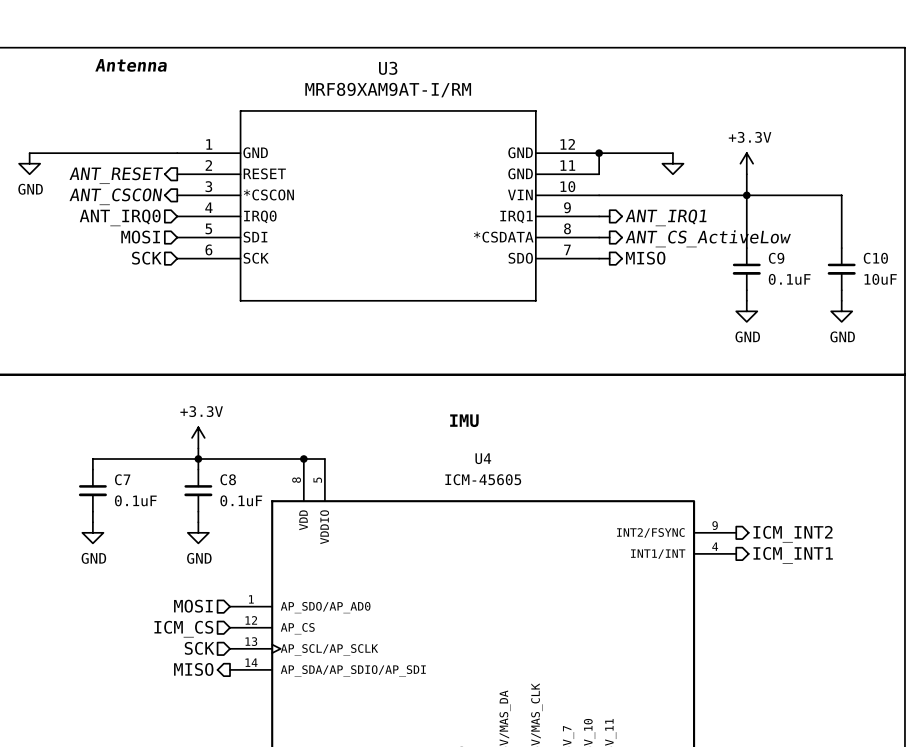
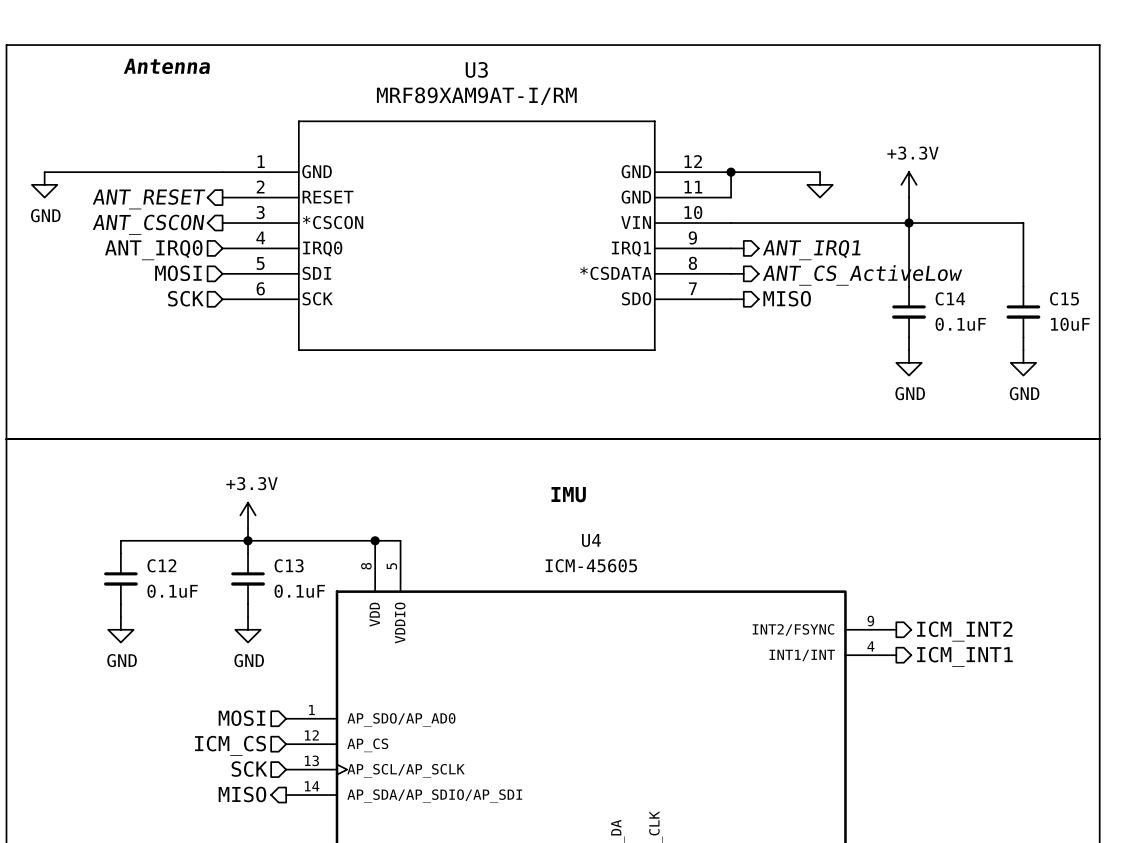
C9 name: C9 (776, 258) -> C14 (950, 298)
C10 name: C10 (875, 258) -> C15 (1064, 298)
C7 name: C7 (122, 479) -> C12 (161, 565)
C8 name: C8 (228, 479) -> C13 (289, 565)

